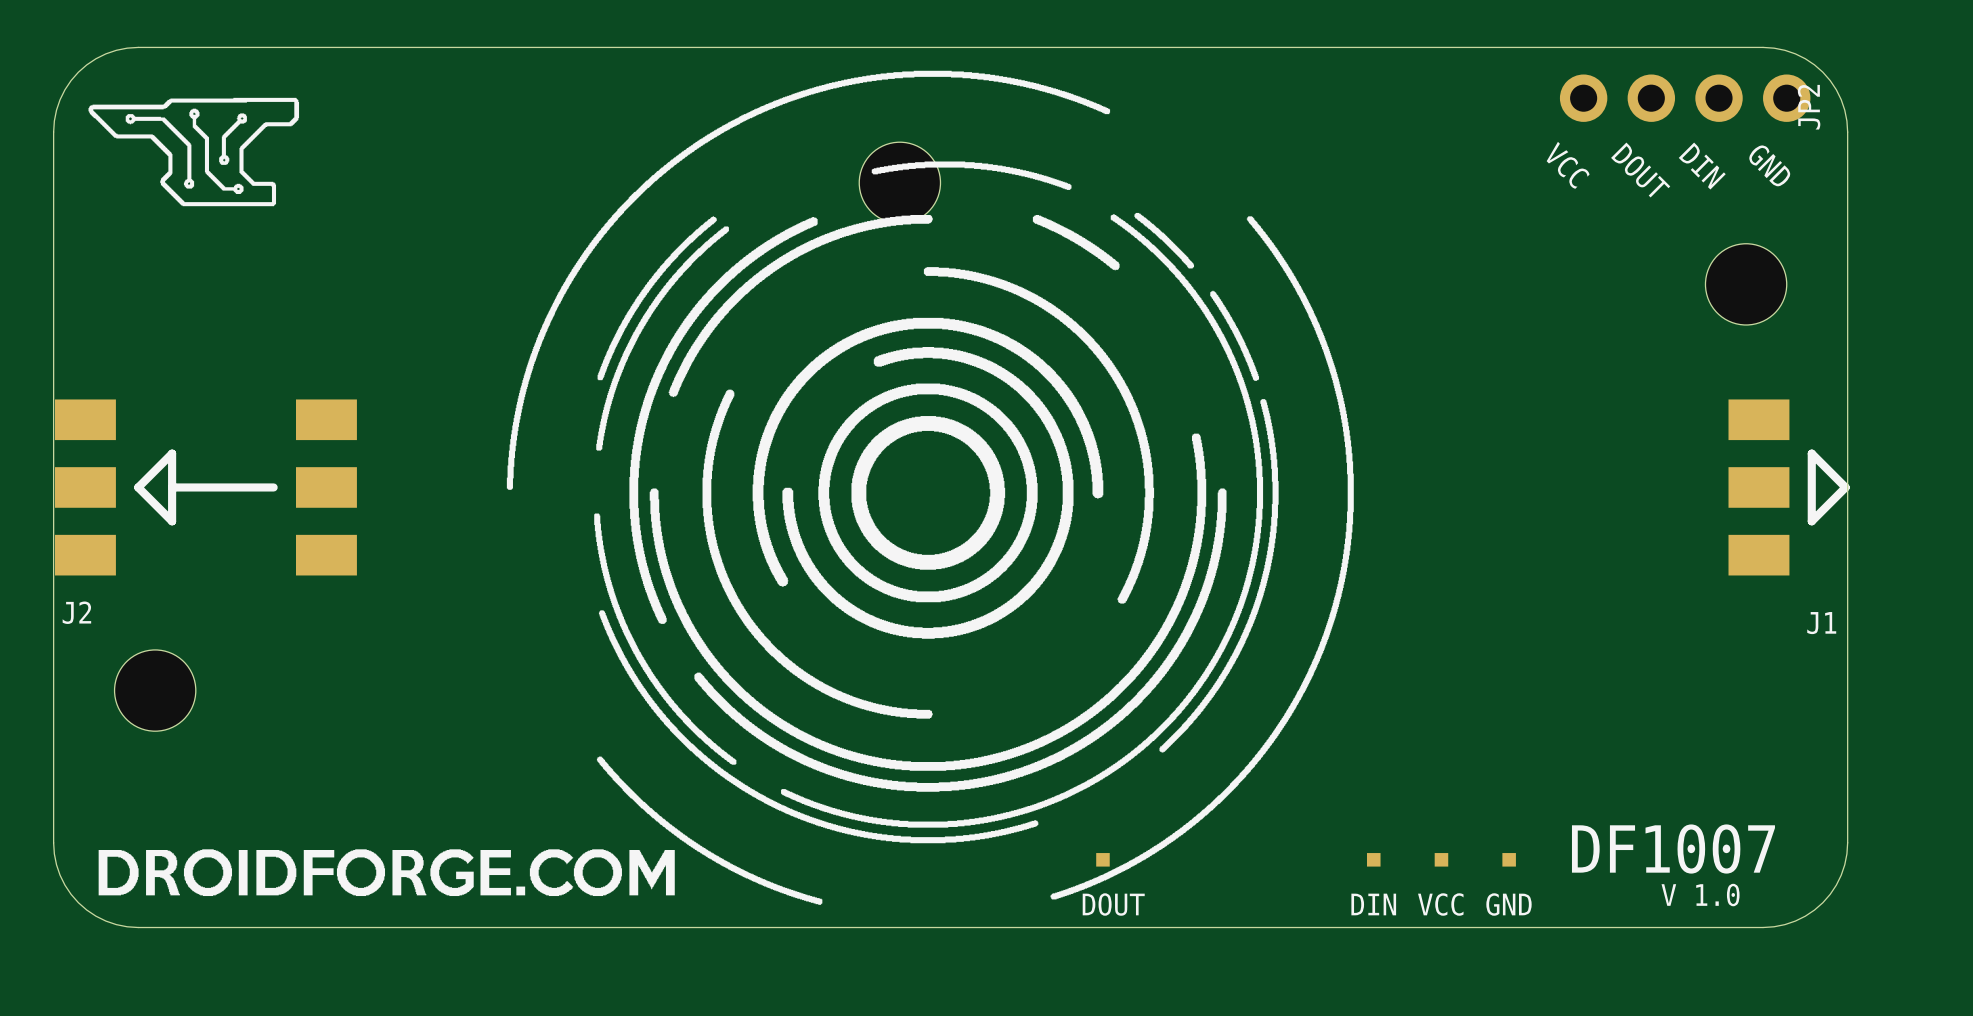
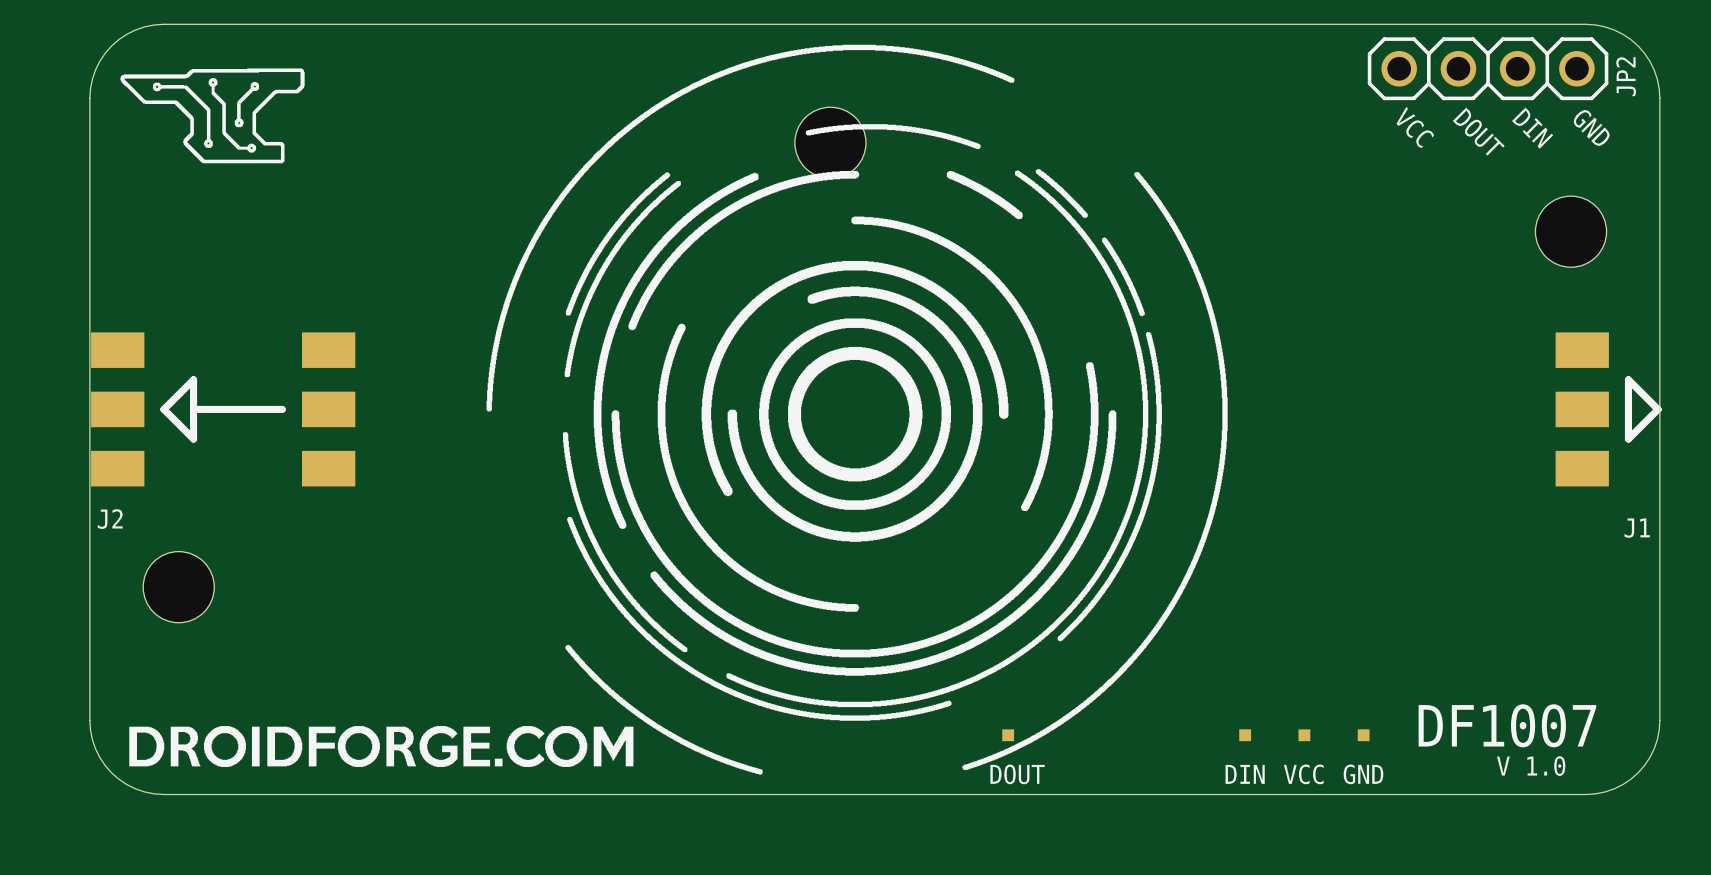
JP2 footprint: [1559, 74, 1811, 122] -> [1367, 37, 1609, 101]

